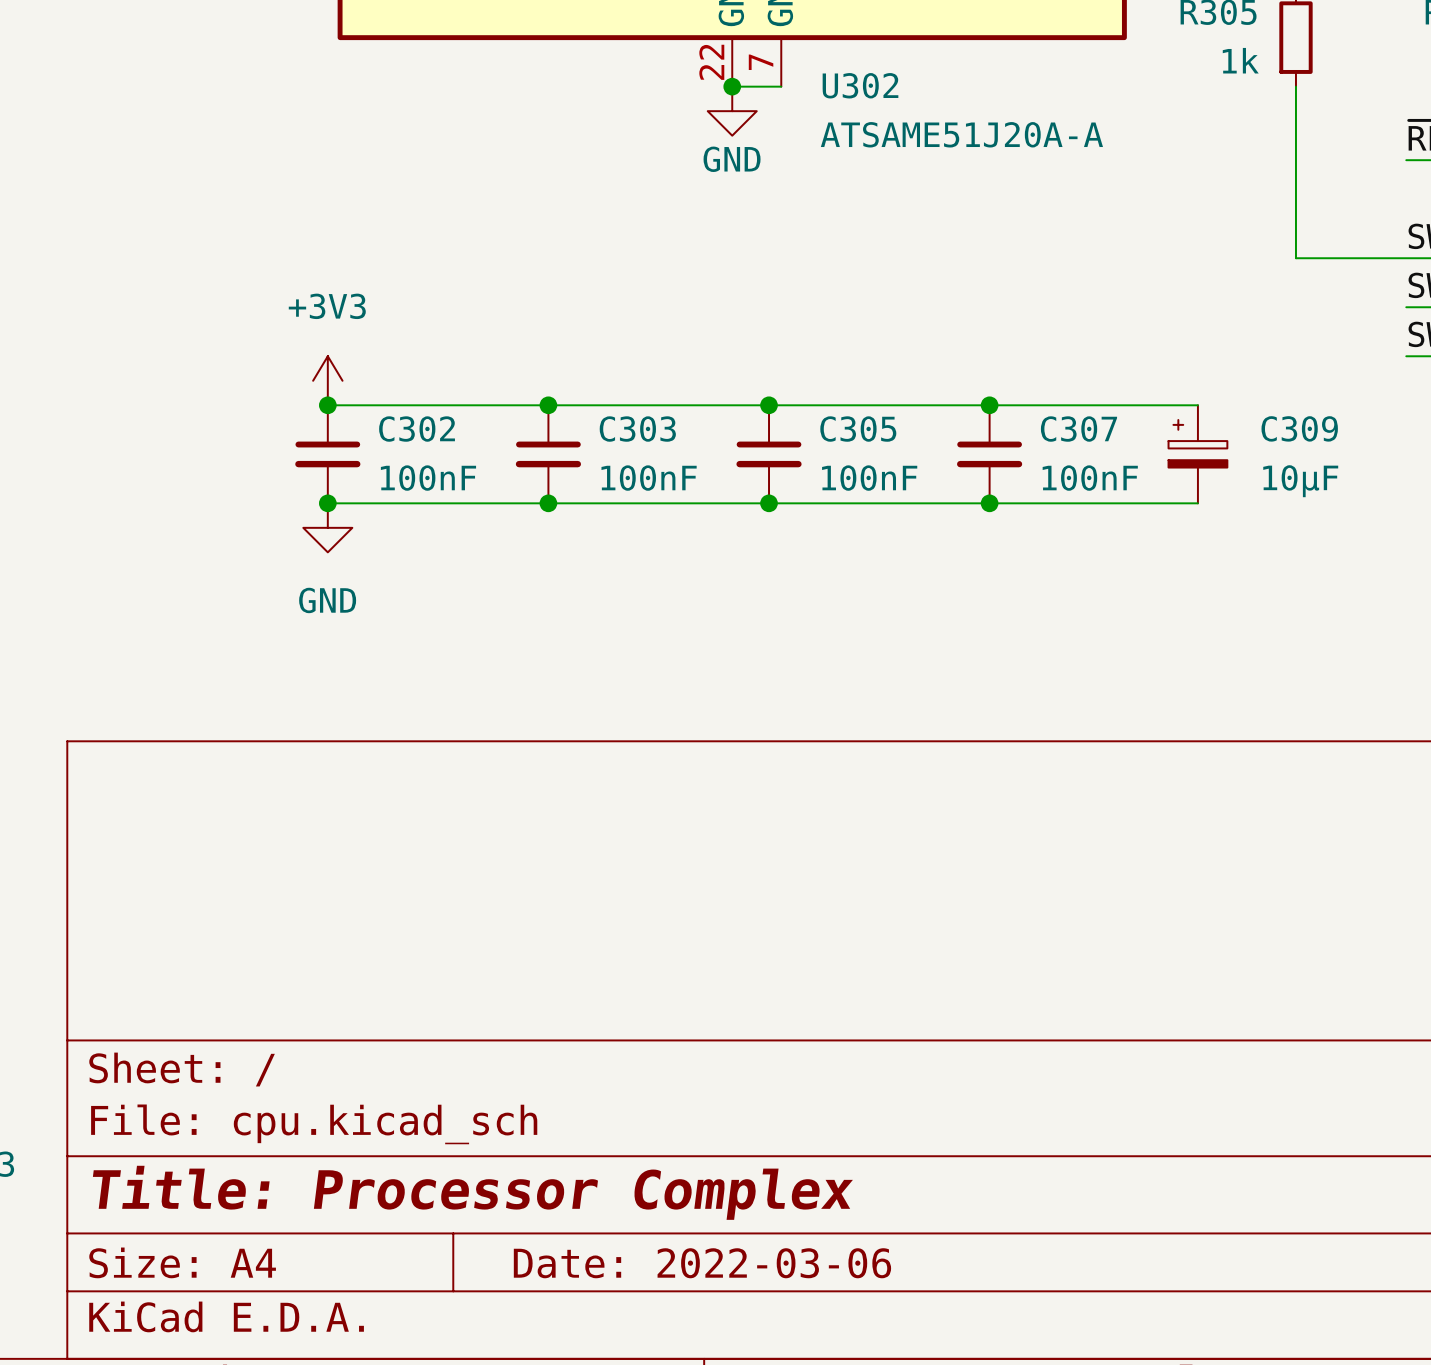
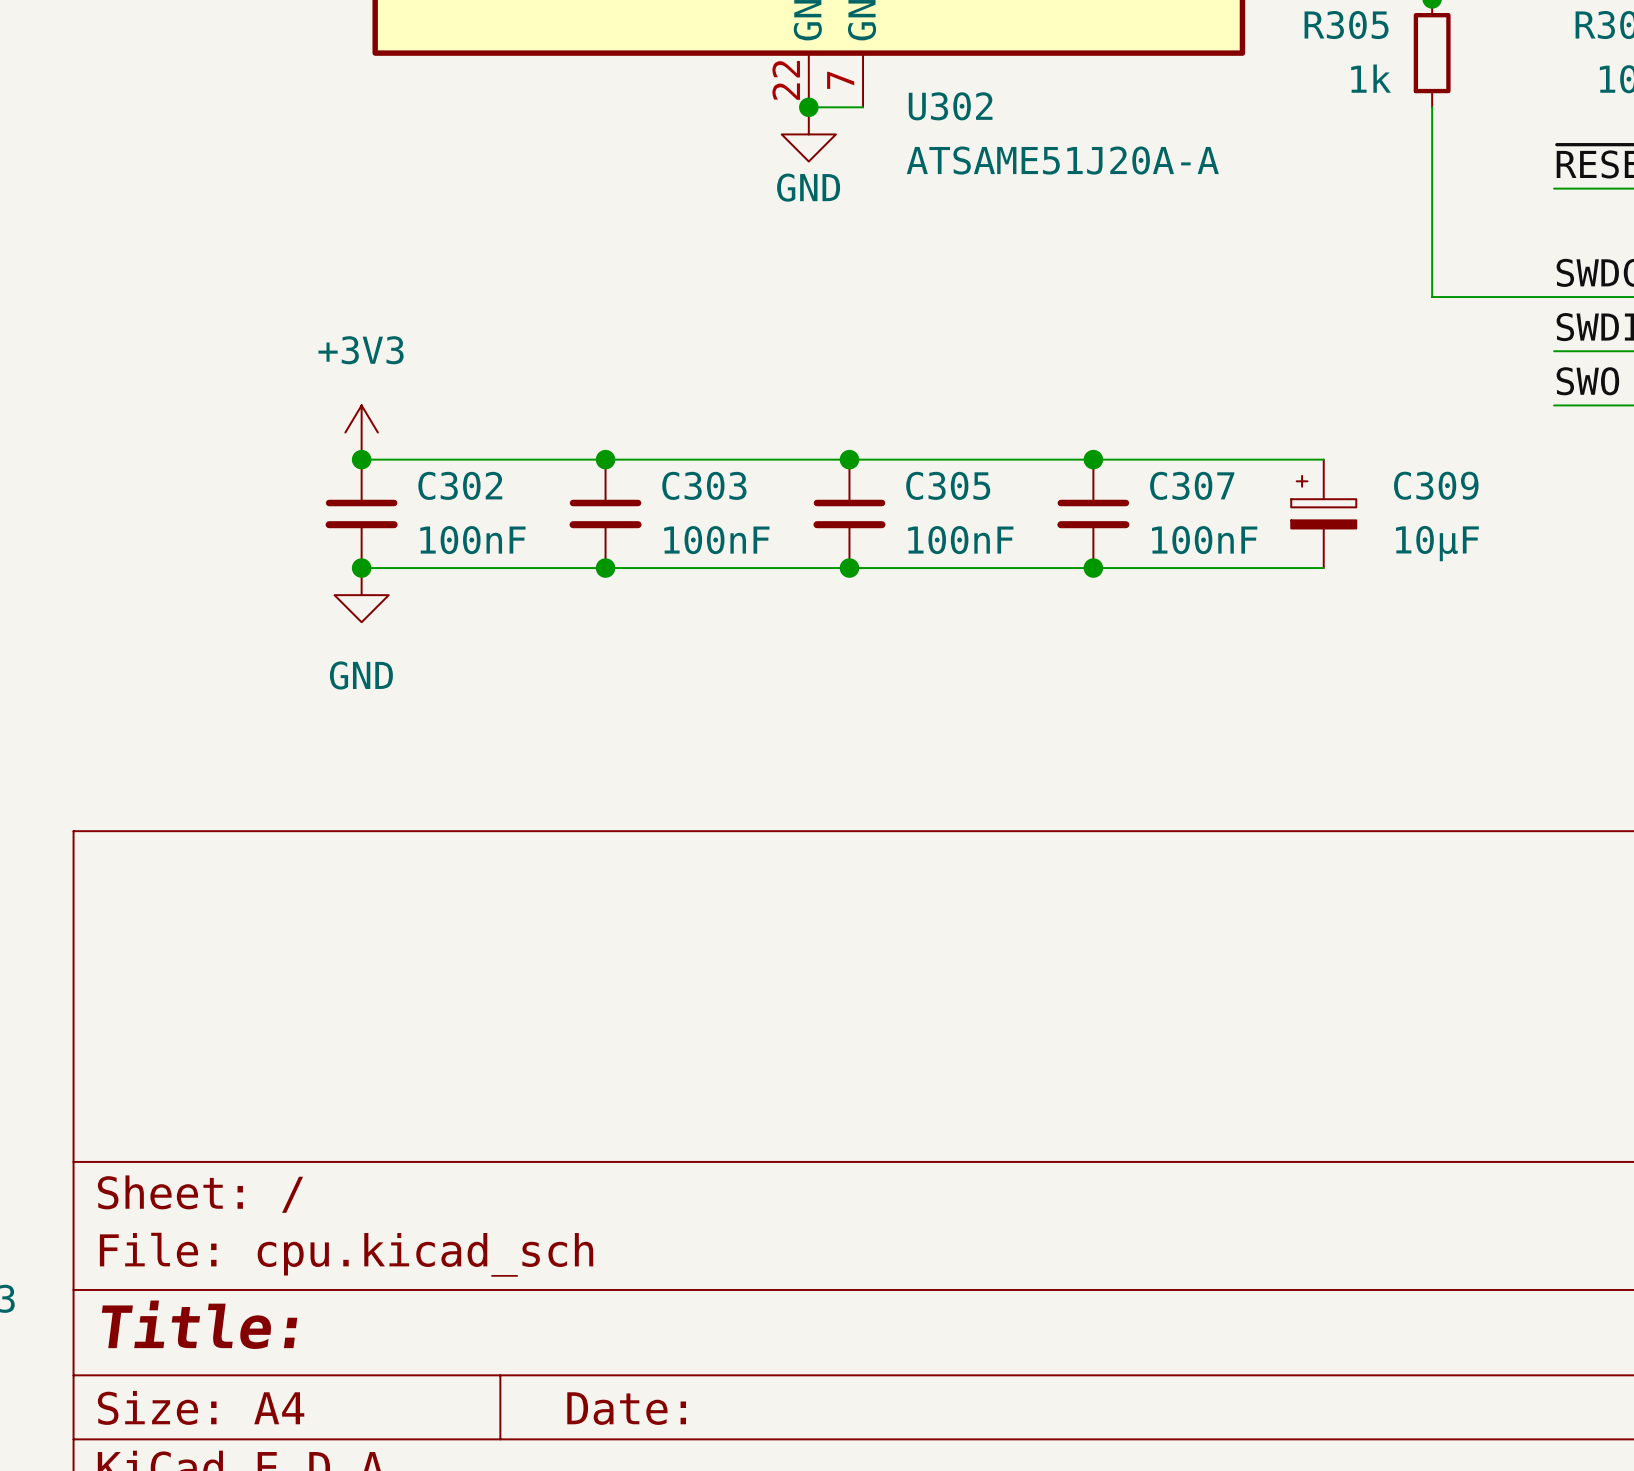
title block: Title: Processor Complex (472, 1192) -> Title: (199, 1324)
title block: Date: 2022-03-06 (702, 1263) -> Date: (626, 1408)

